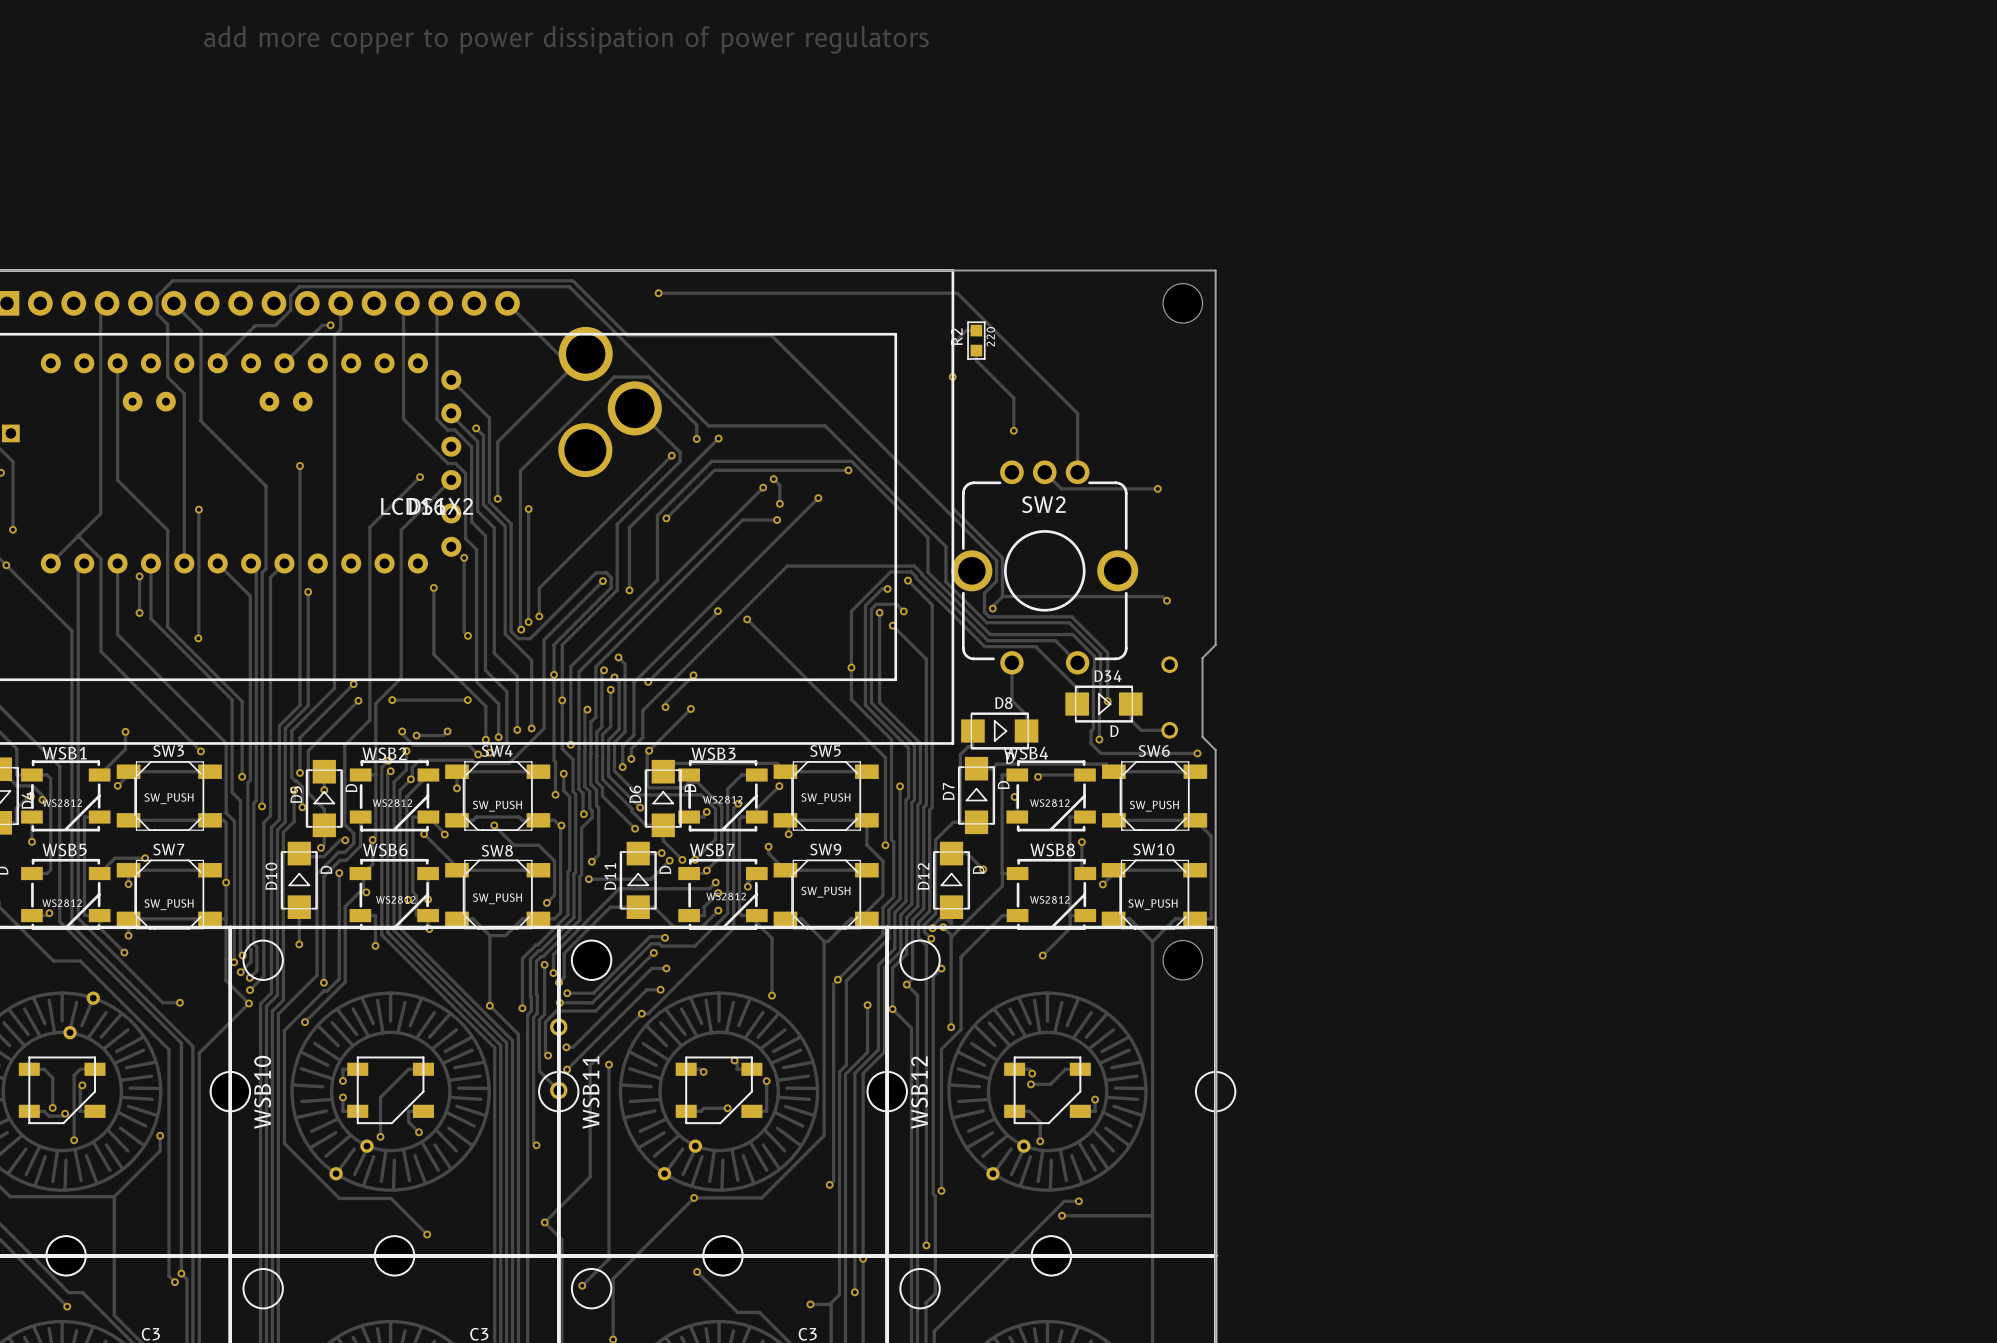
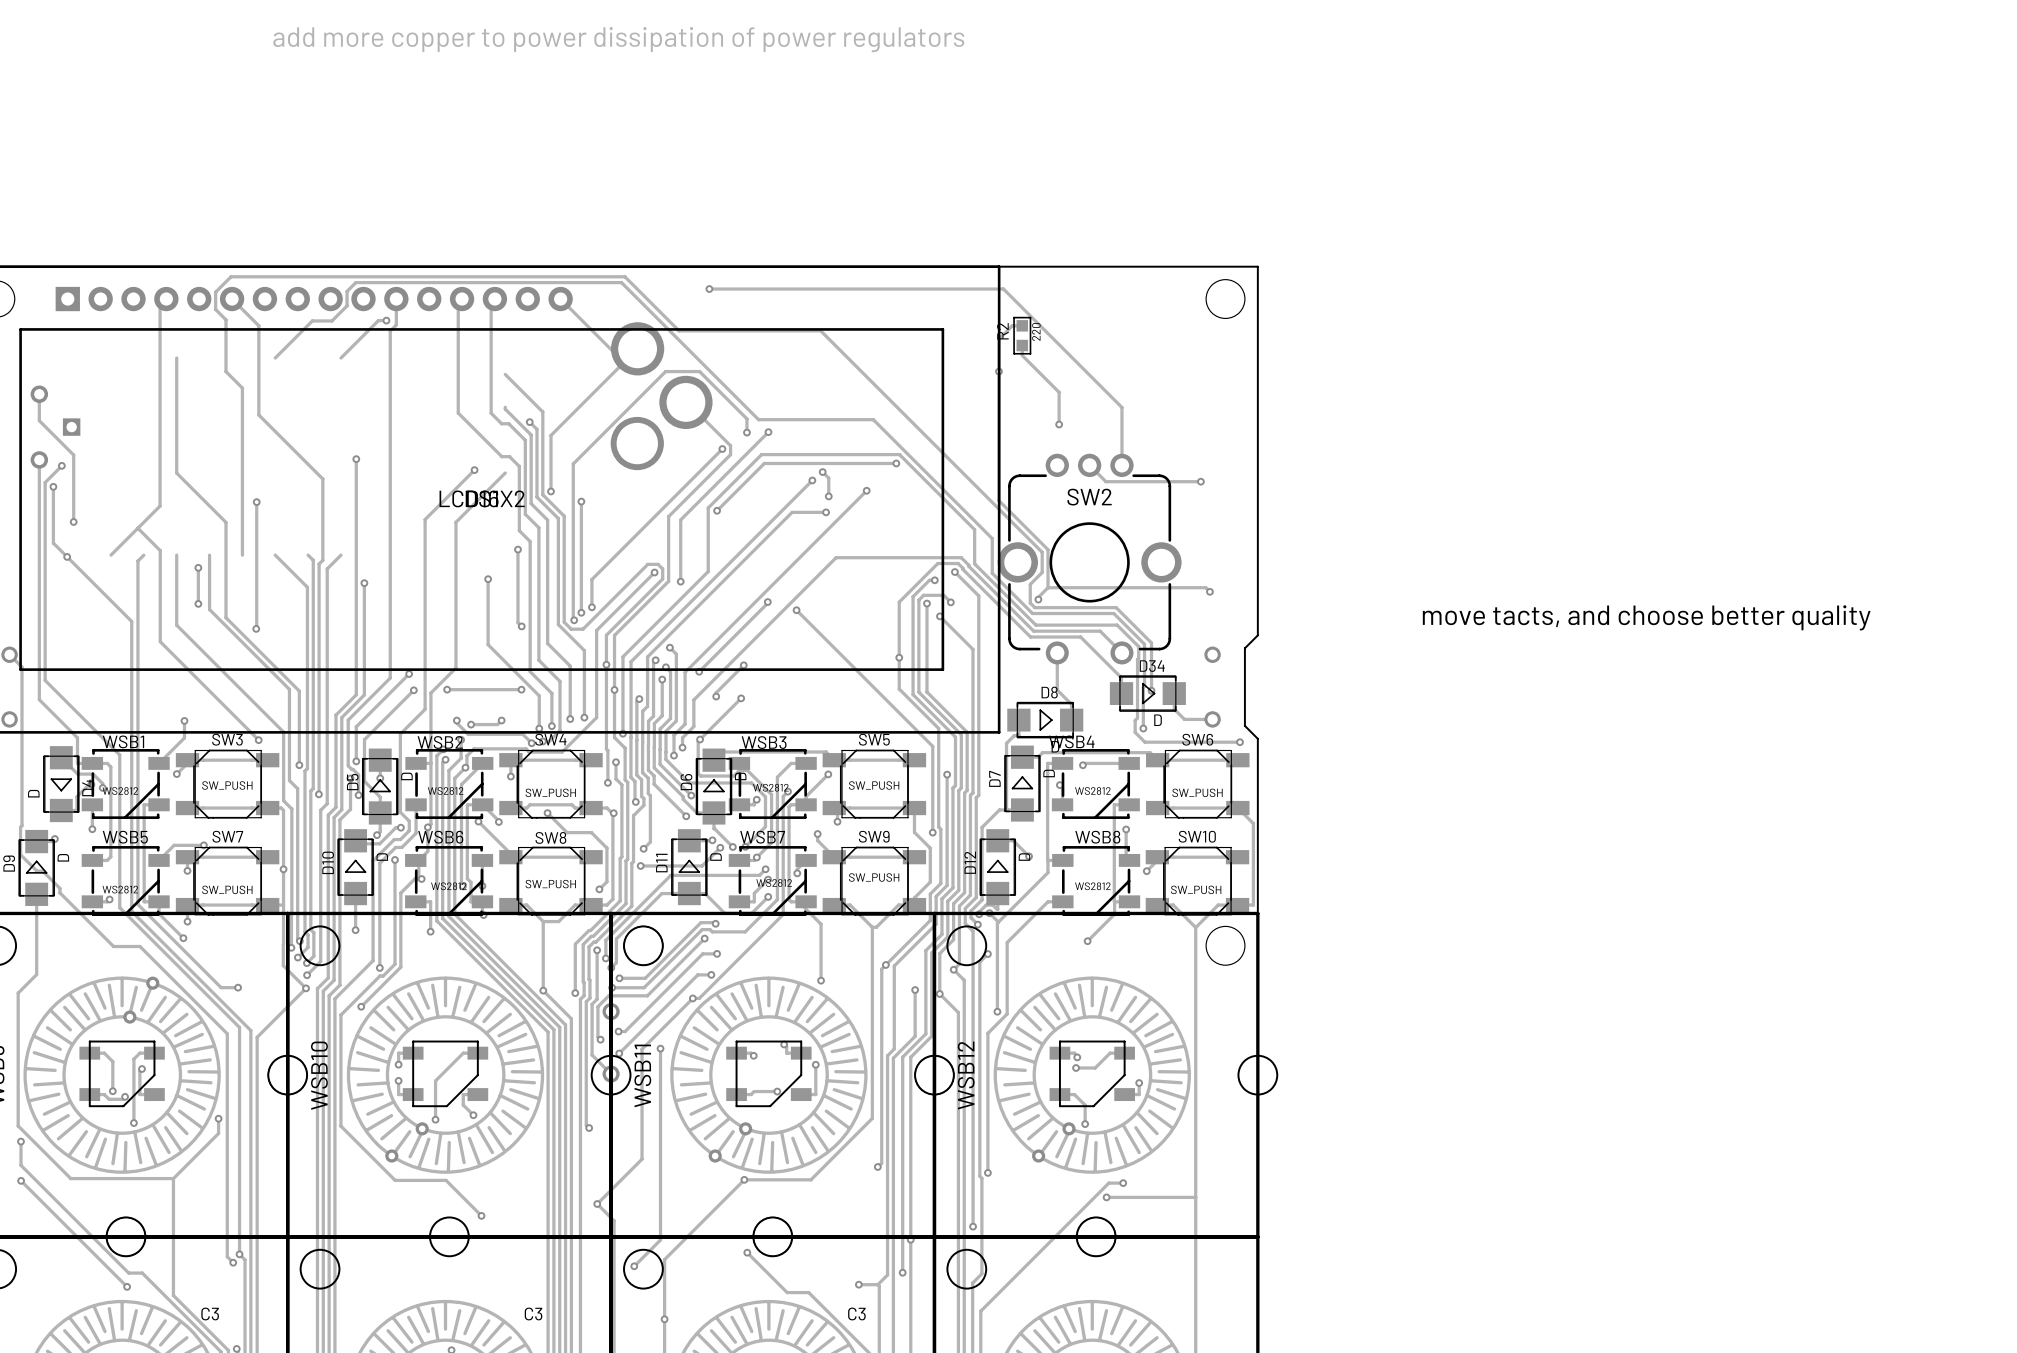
part: (251, 463) -> none
text: none -> move tacts, and choose better quality (1646, 617)

